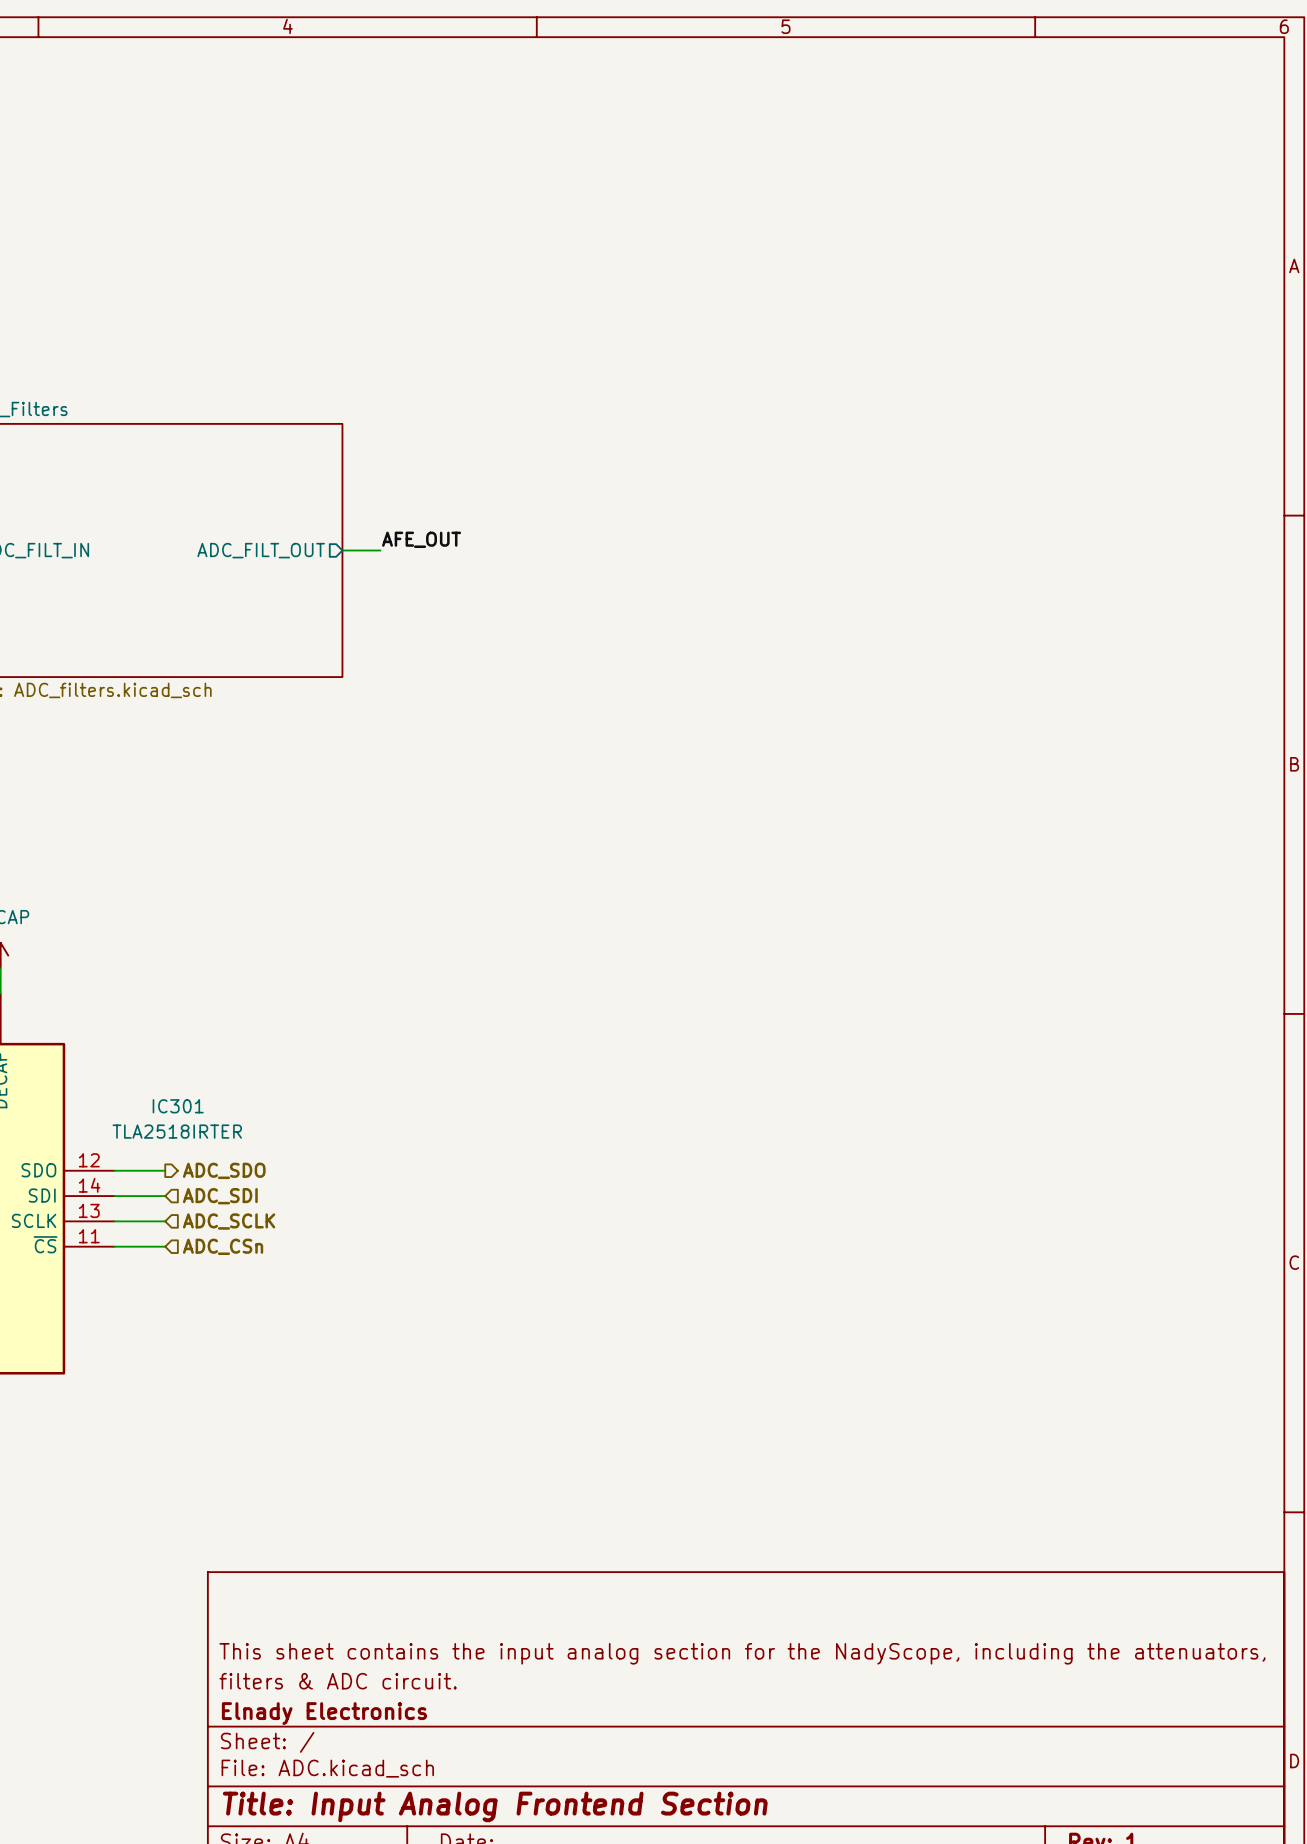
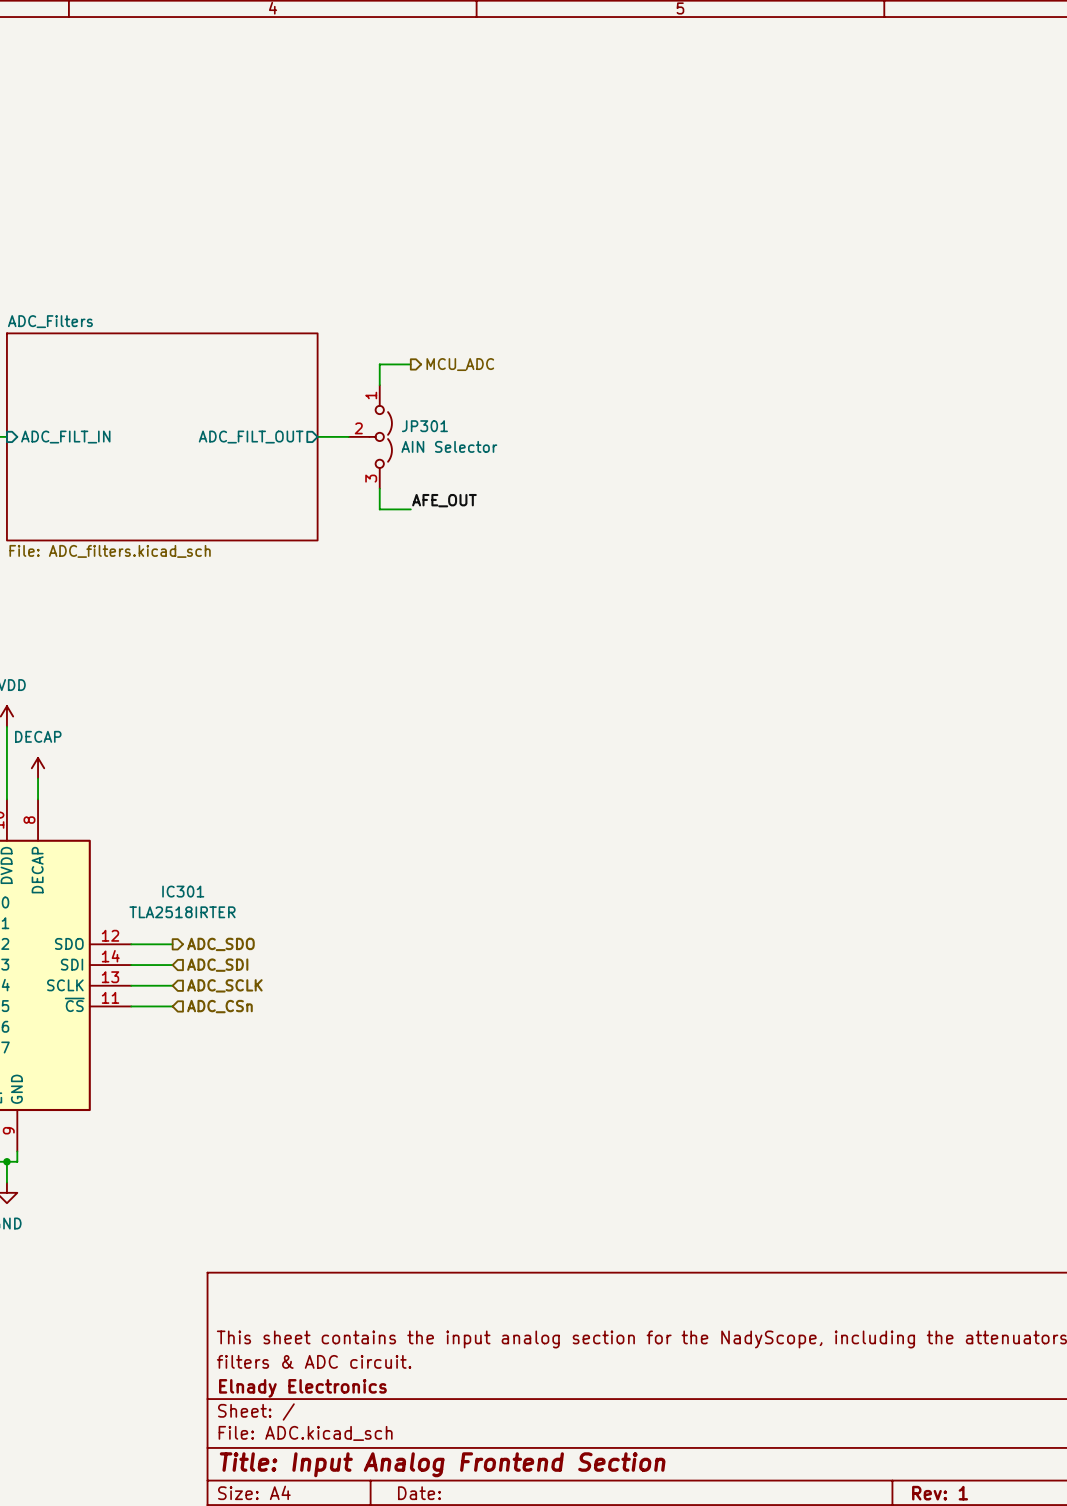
wire: none -> (410, 364) (379, 364) (379, 385)
hierarchical label: none -> MCU_ADC (460, 364)
label position: AFE_OUT (421, 539) -> AFE_OUT (444, 500)
JP301: none -> AIN Selector (370, 436)
wire: none -> (379, 488) (379, 509) (410, 509)

